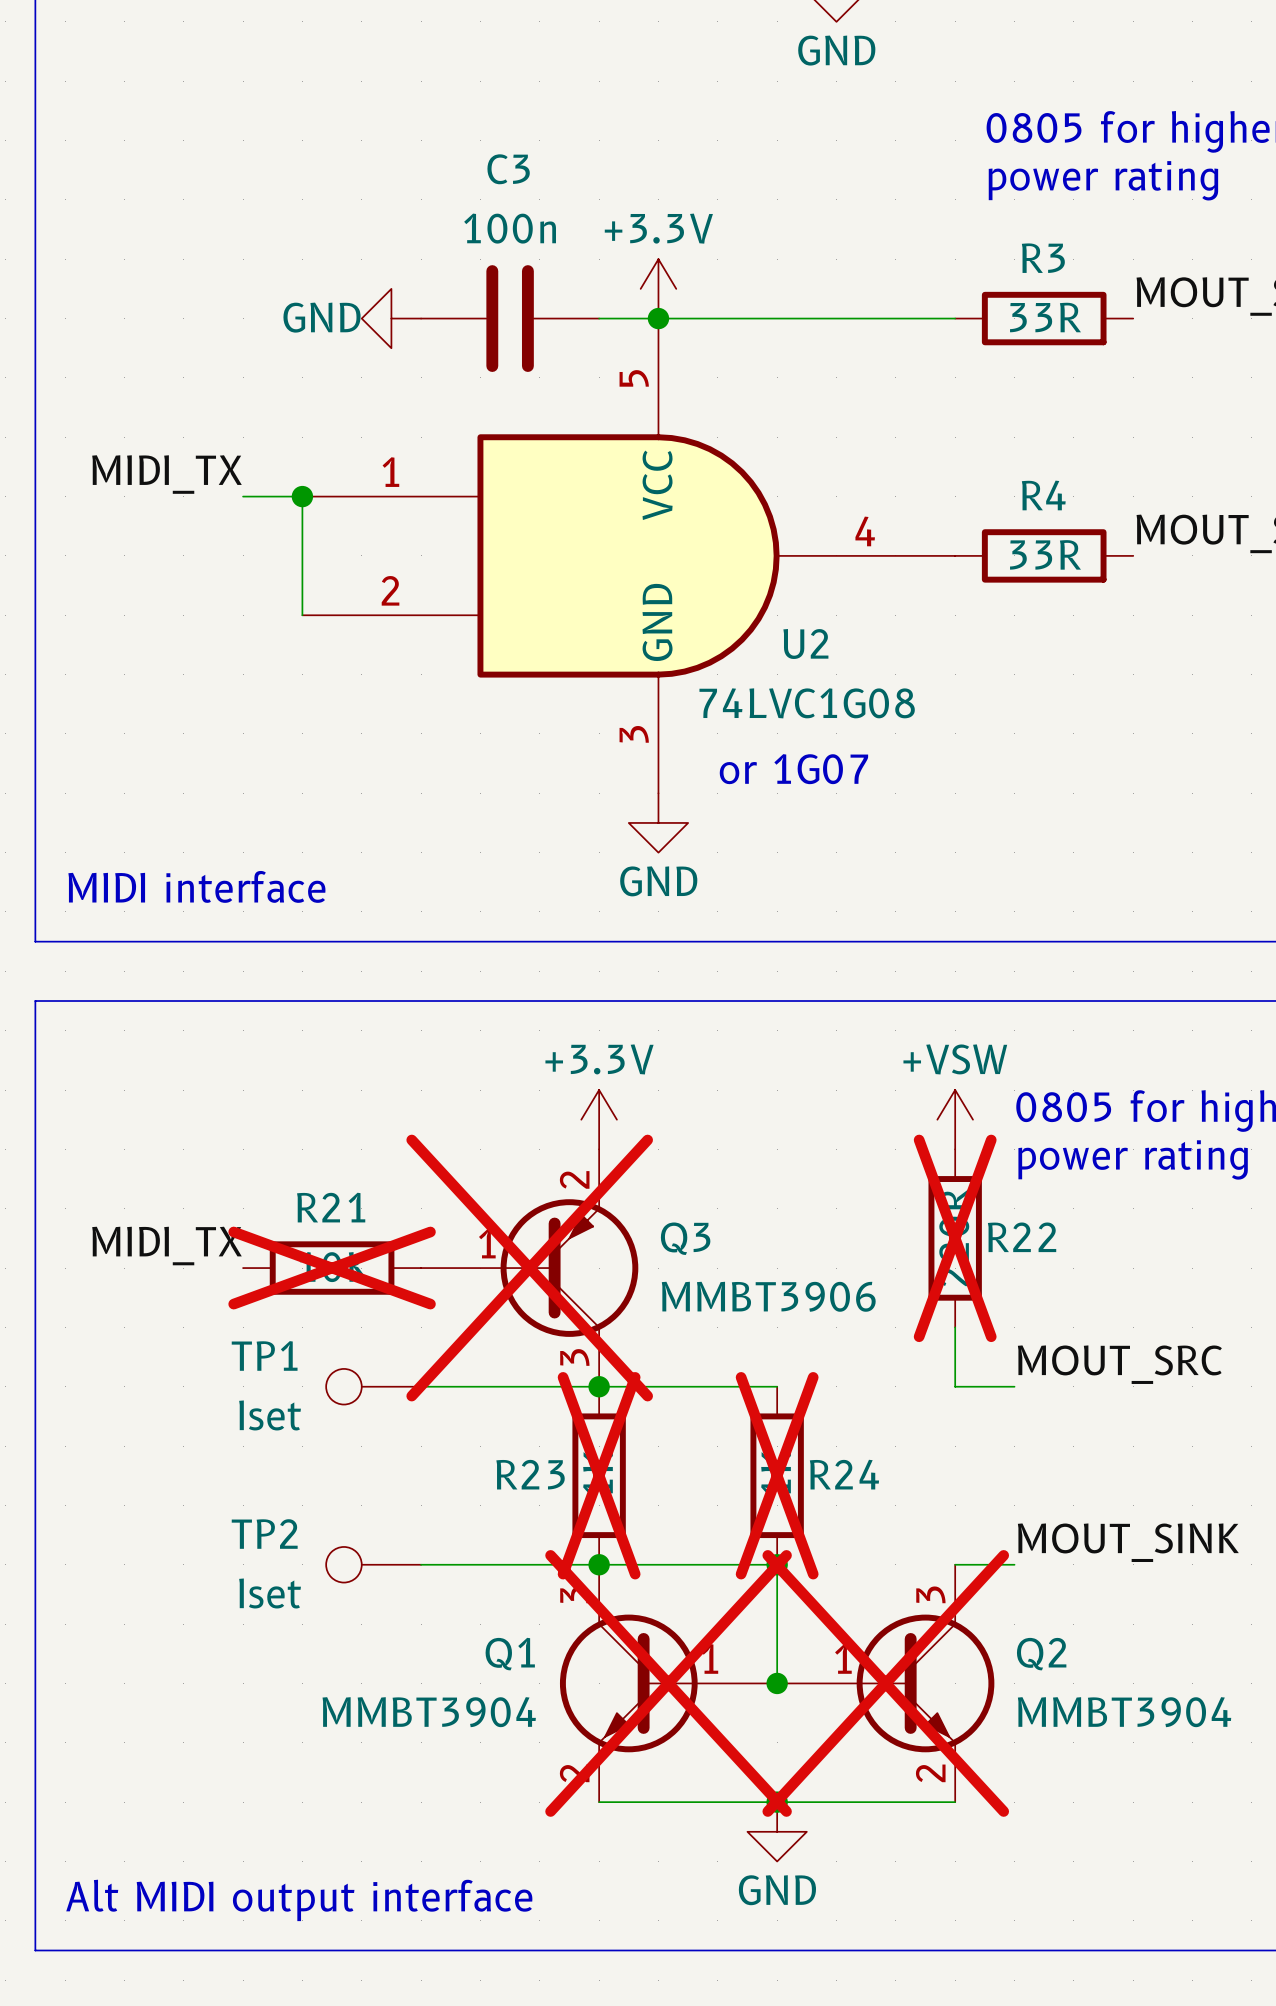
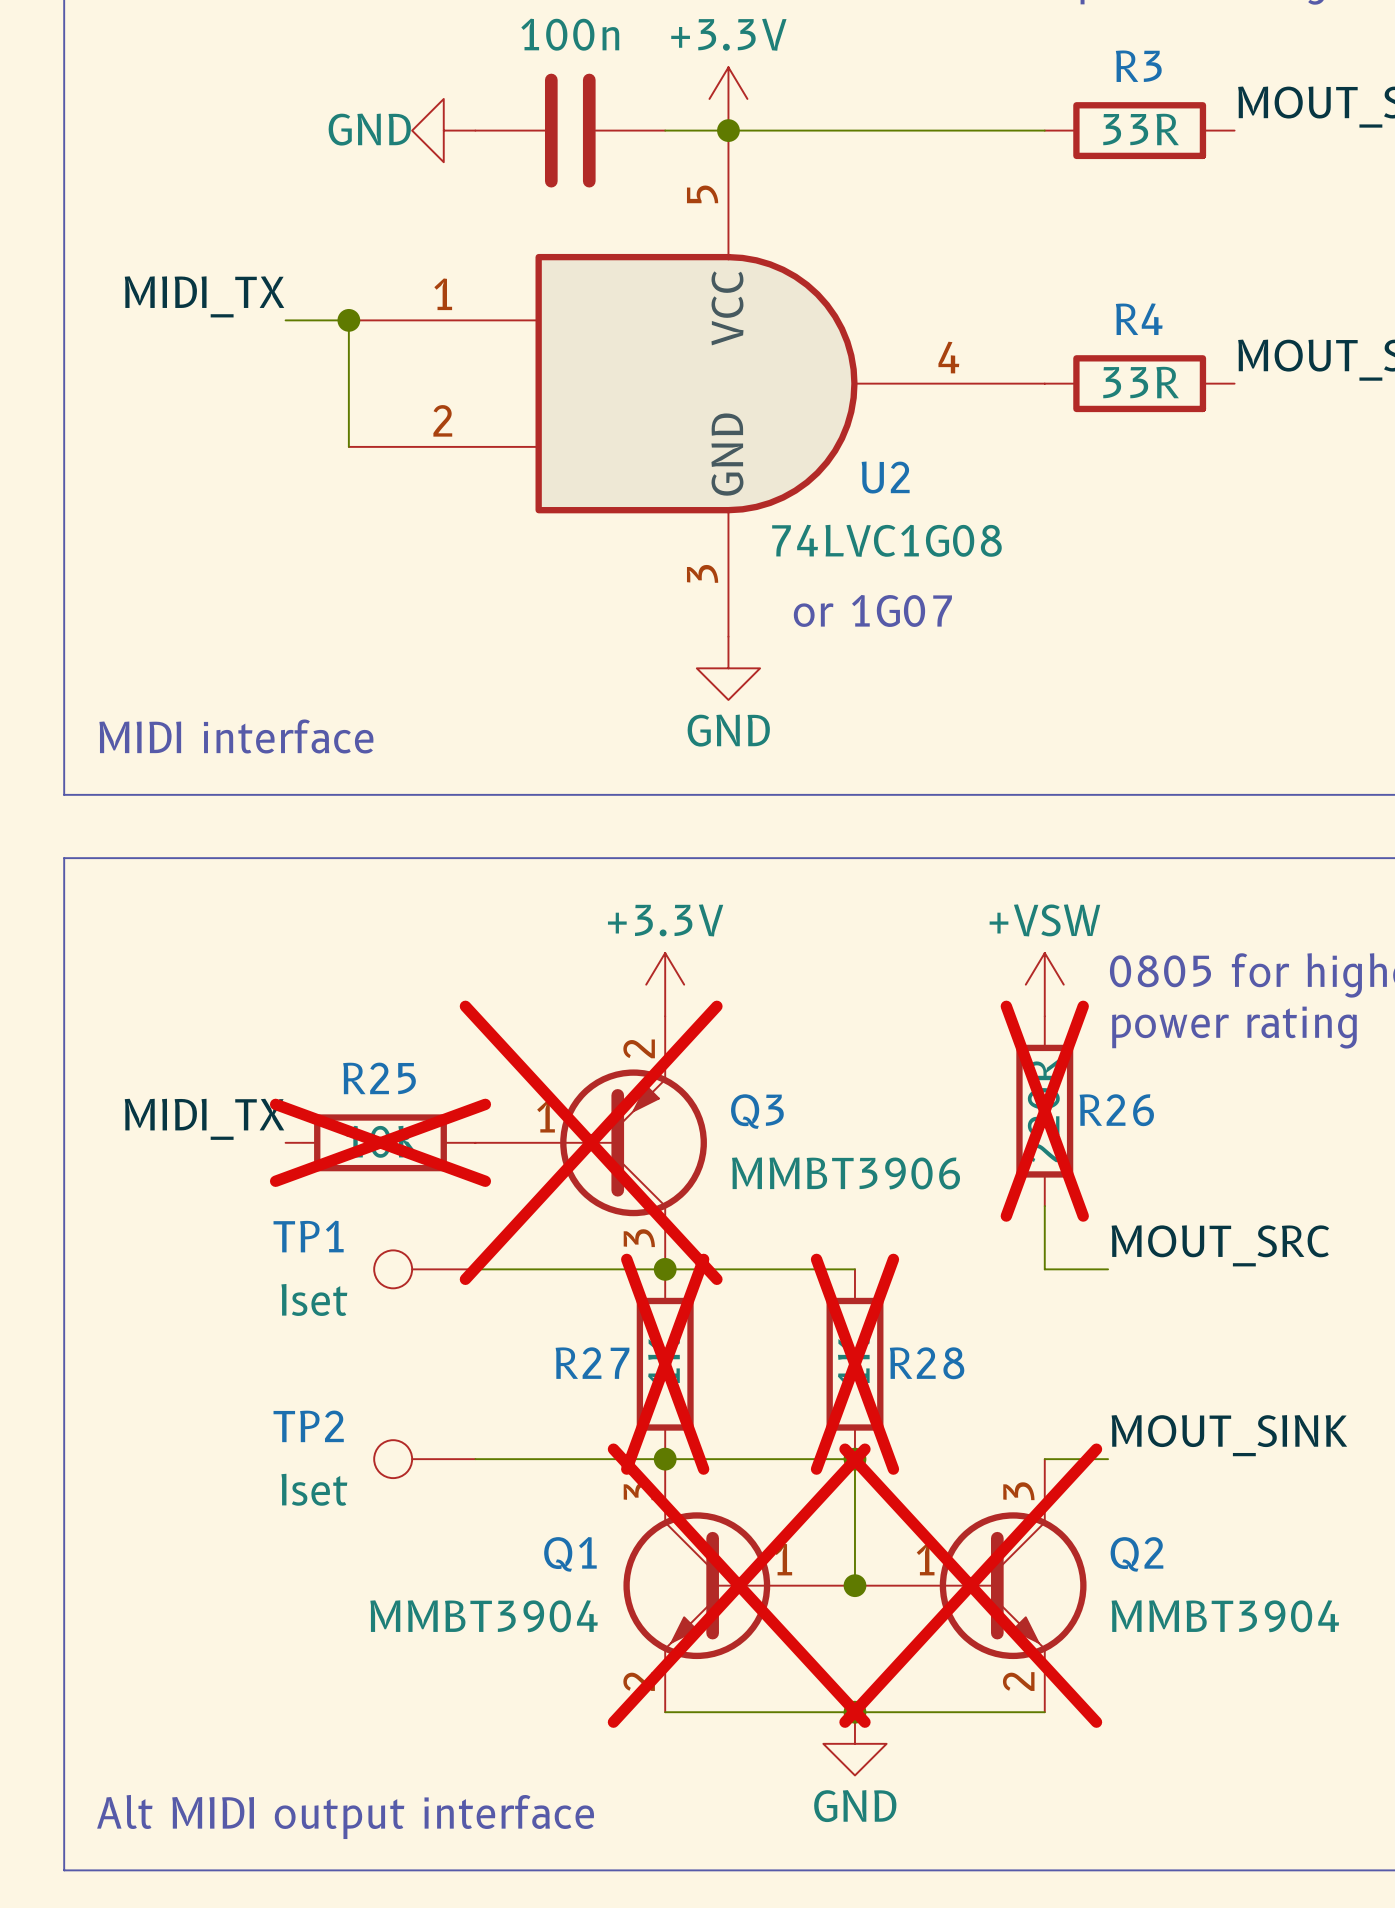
R21 name: R21 (331, 1207) -> R25 (379, 1078)
R22 name: R22 (1022, 1237) -> R26 (1116, 1110)
R23 name: R23 (530, 1474) -> R27 (592, 1363)
R24 name: R24 (844, 1474) -> R28 (927, 1363)

